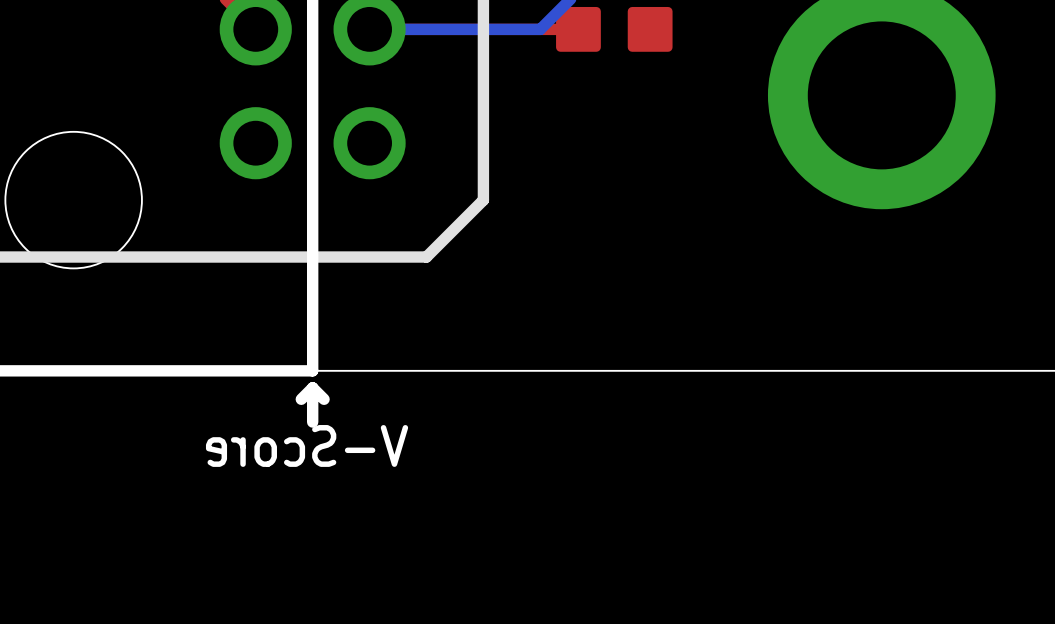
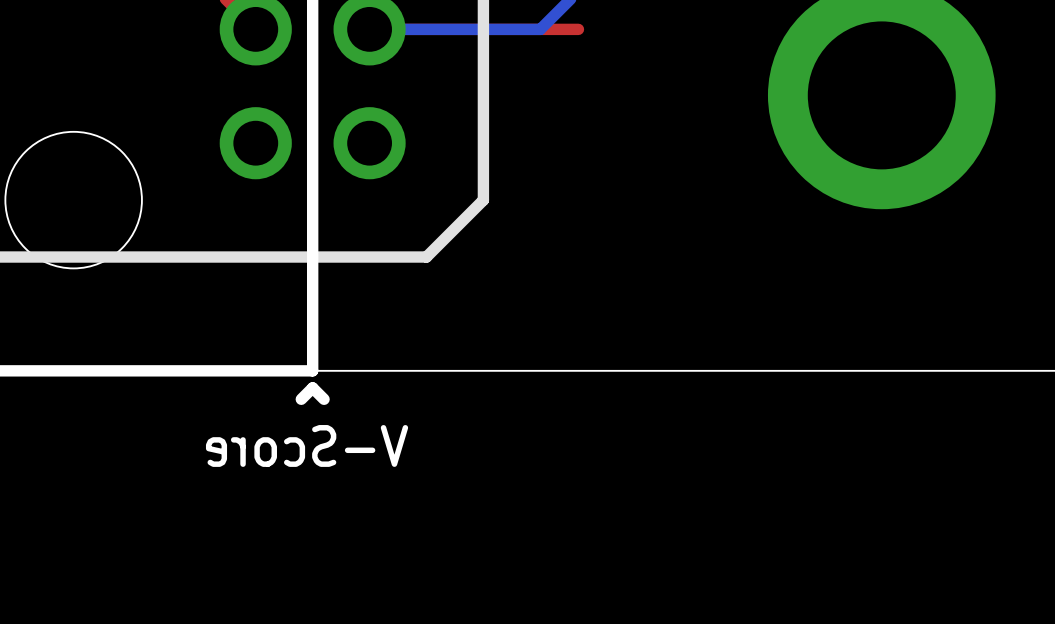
part: (614, 29) -> none
board edge: (312, 387) (312, 422) -> none

